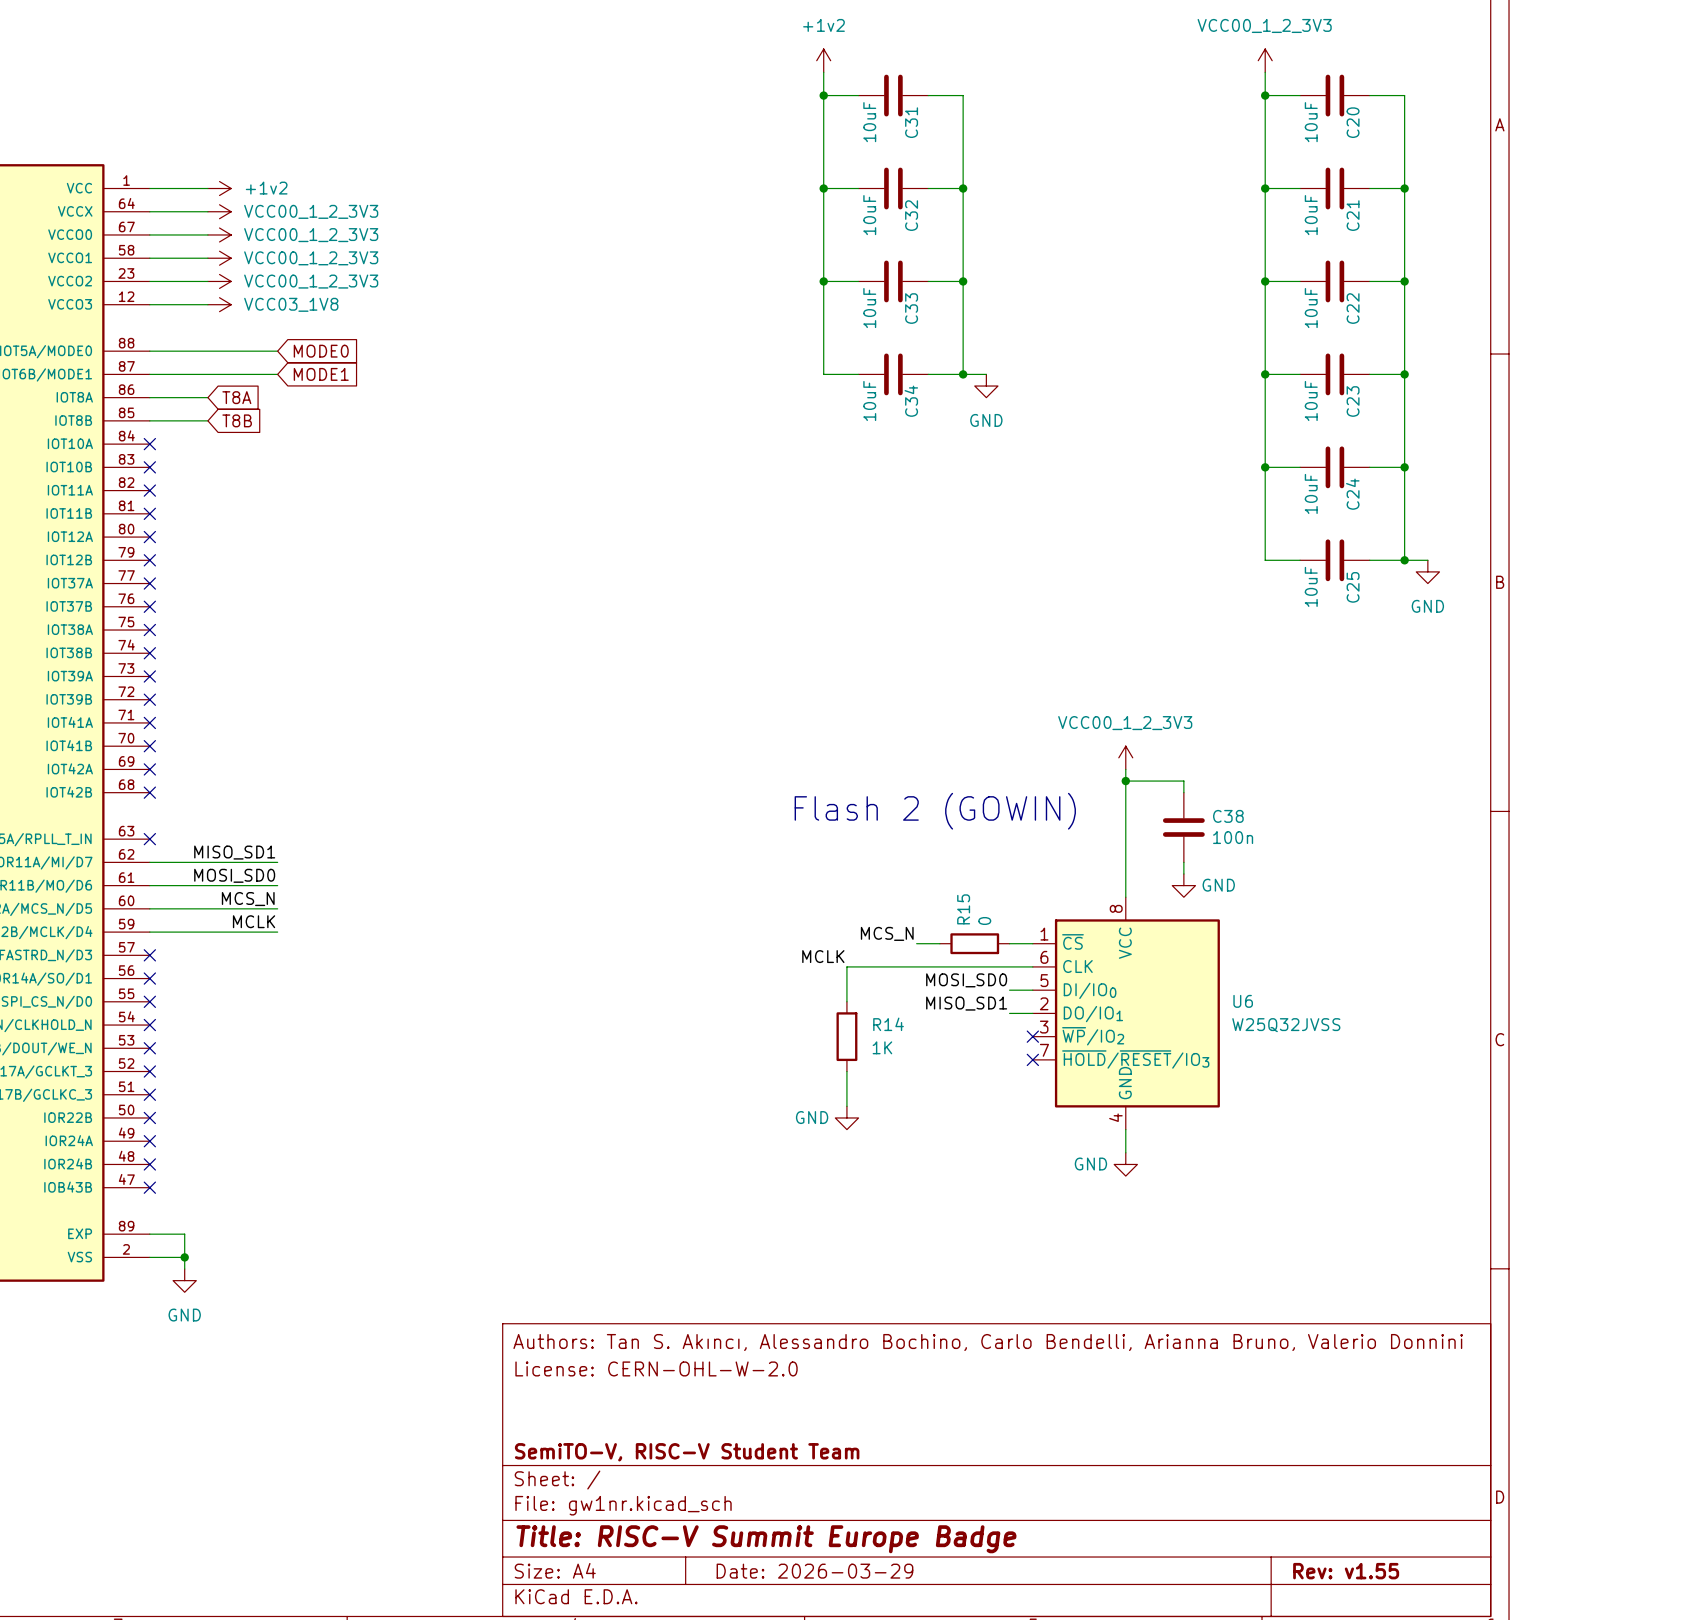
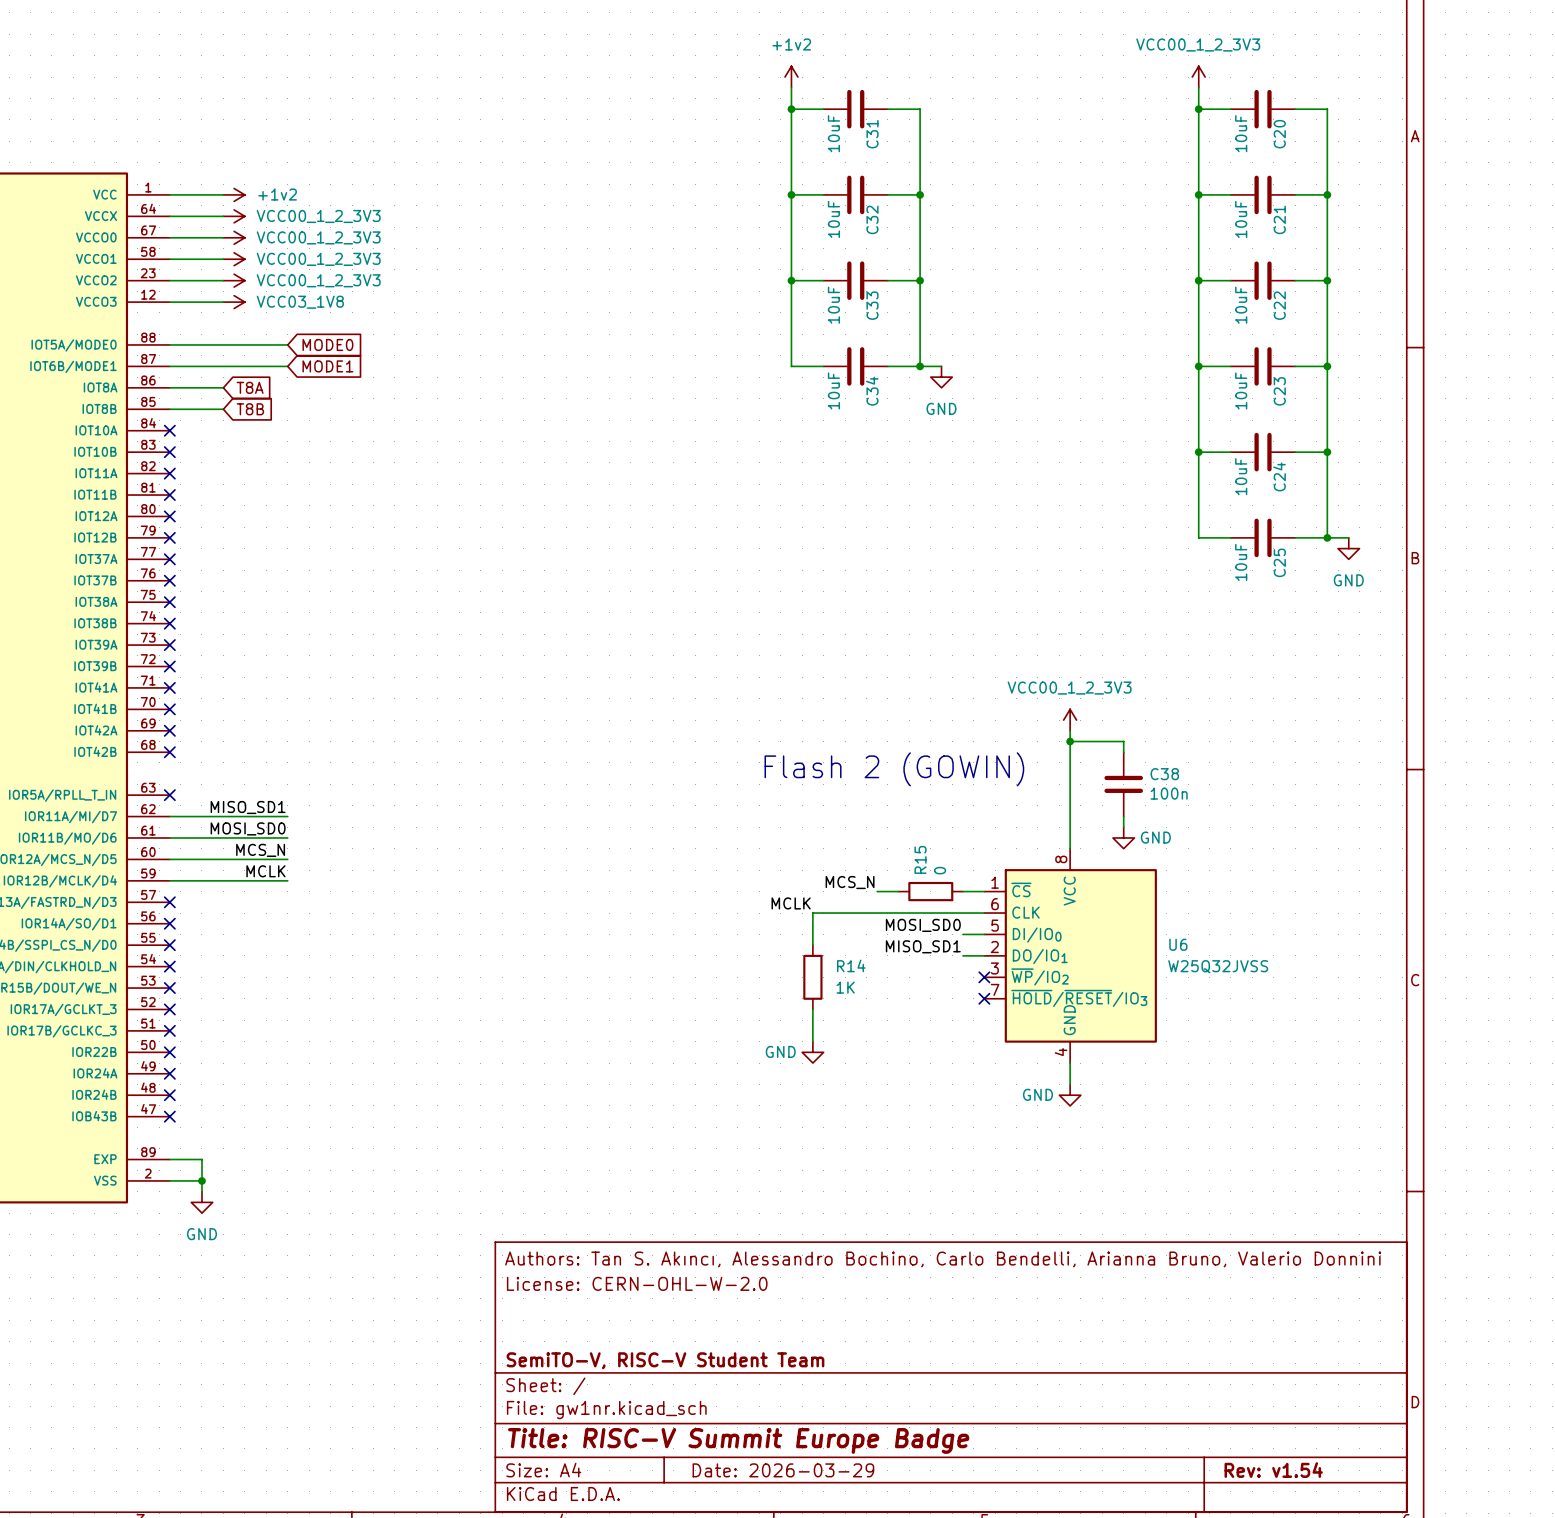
title block: Rev: v1.55 (1346, 1571) -> Rev: v1.54 (1273, 1470)

